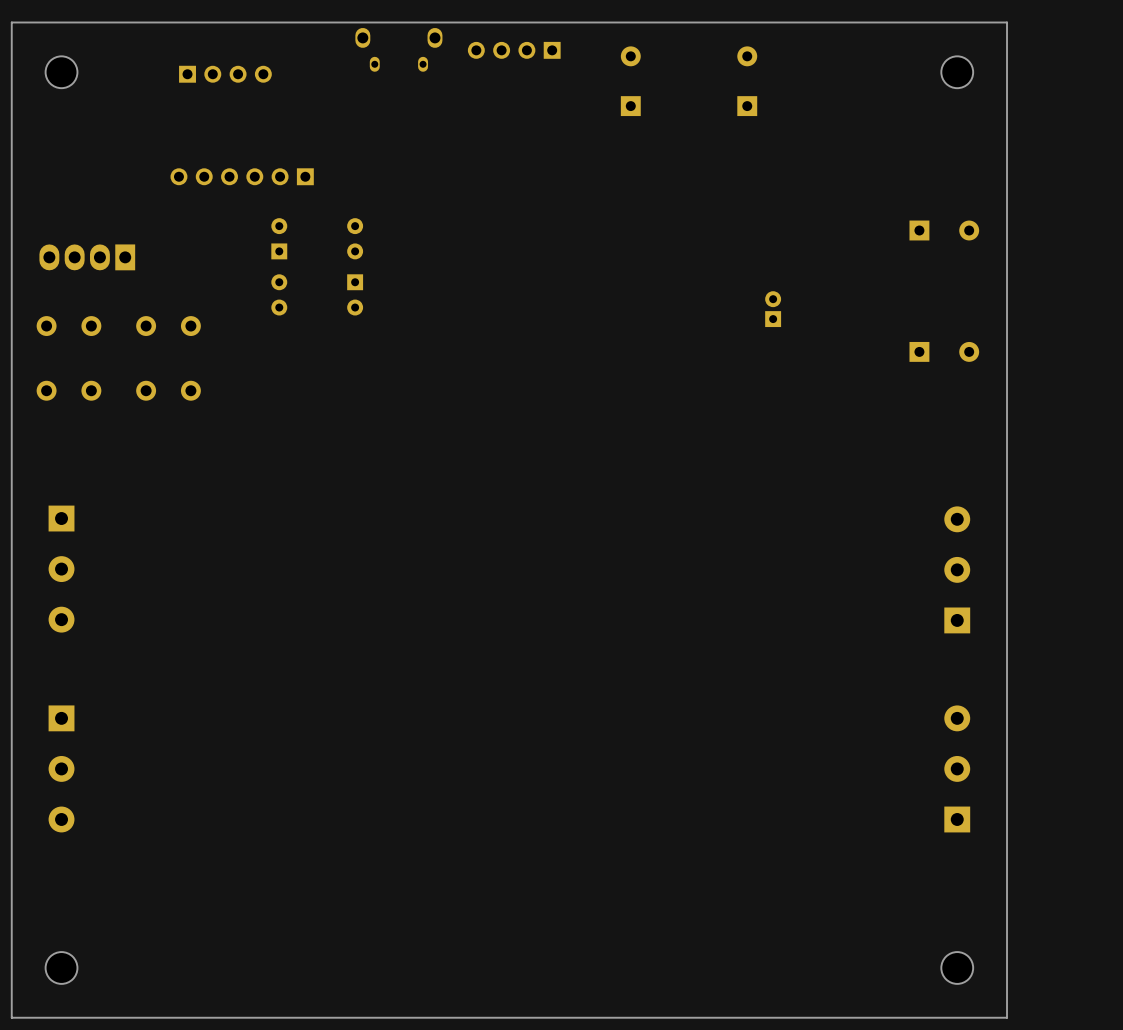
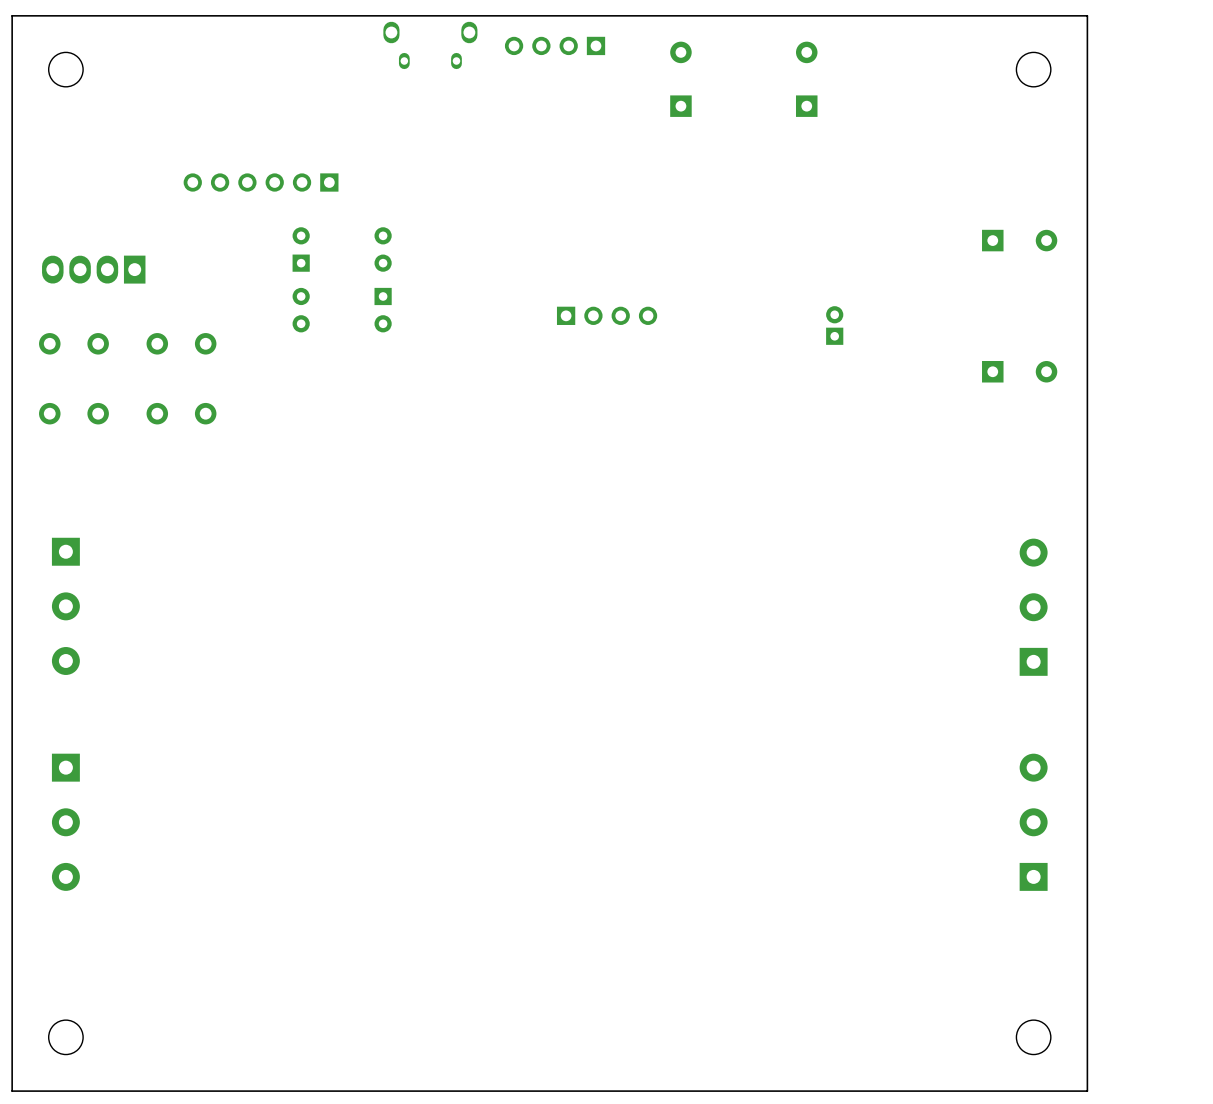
part: (225, 74) -> none
part: none -> (607, 315)

